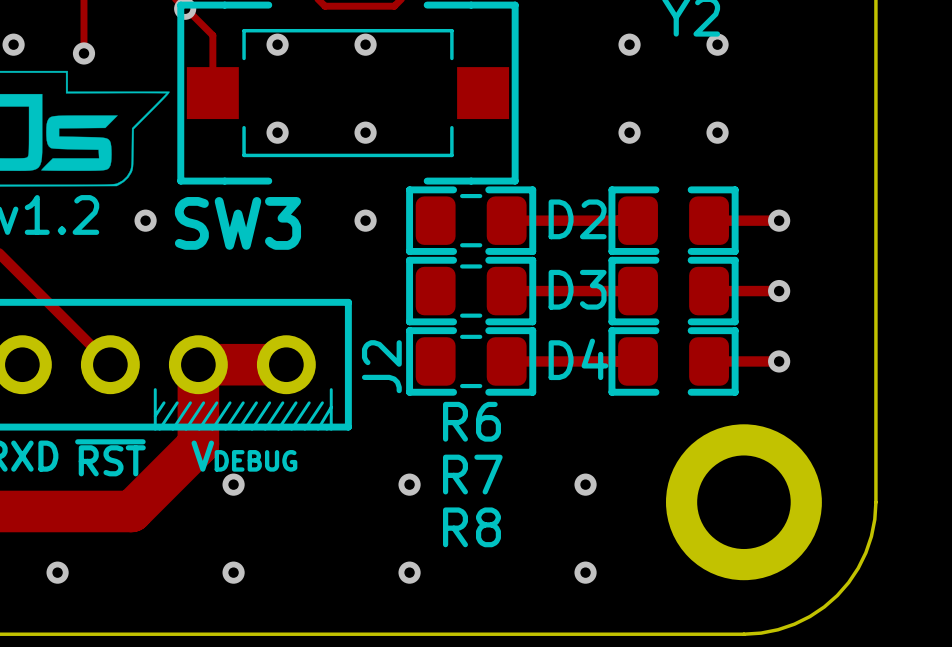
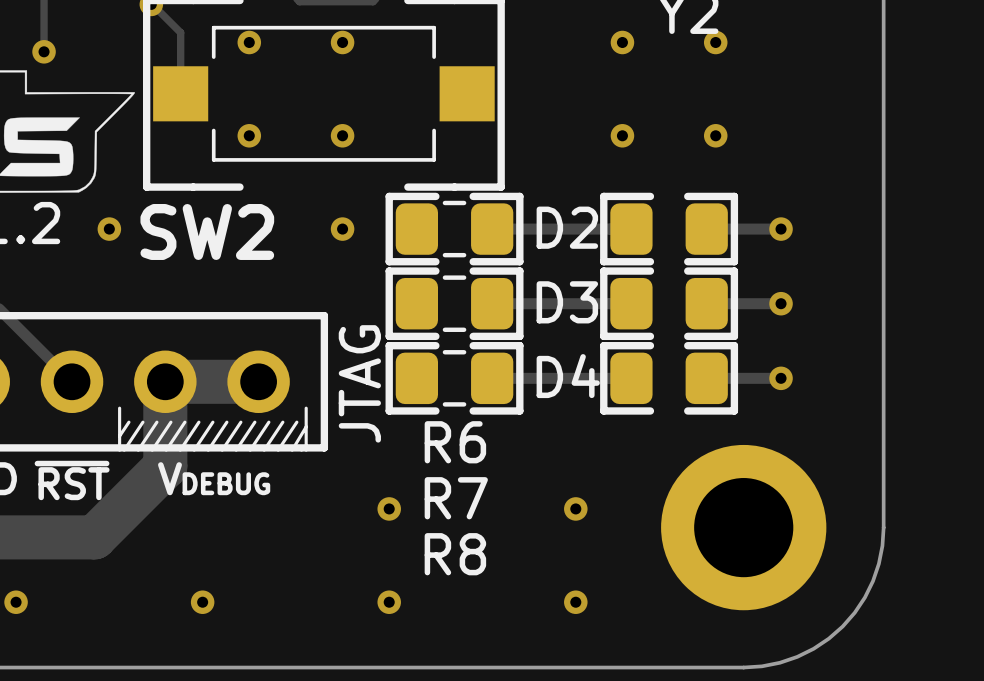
SW3 name: SW3 (237, 223) -> SW2 (207, 231)
J2 name: J2 (381, 366) -> JTAG (359, 383)
via: (233, 484) -> none

